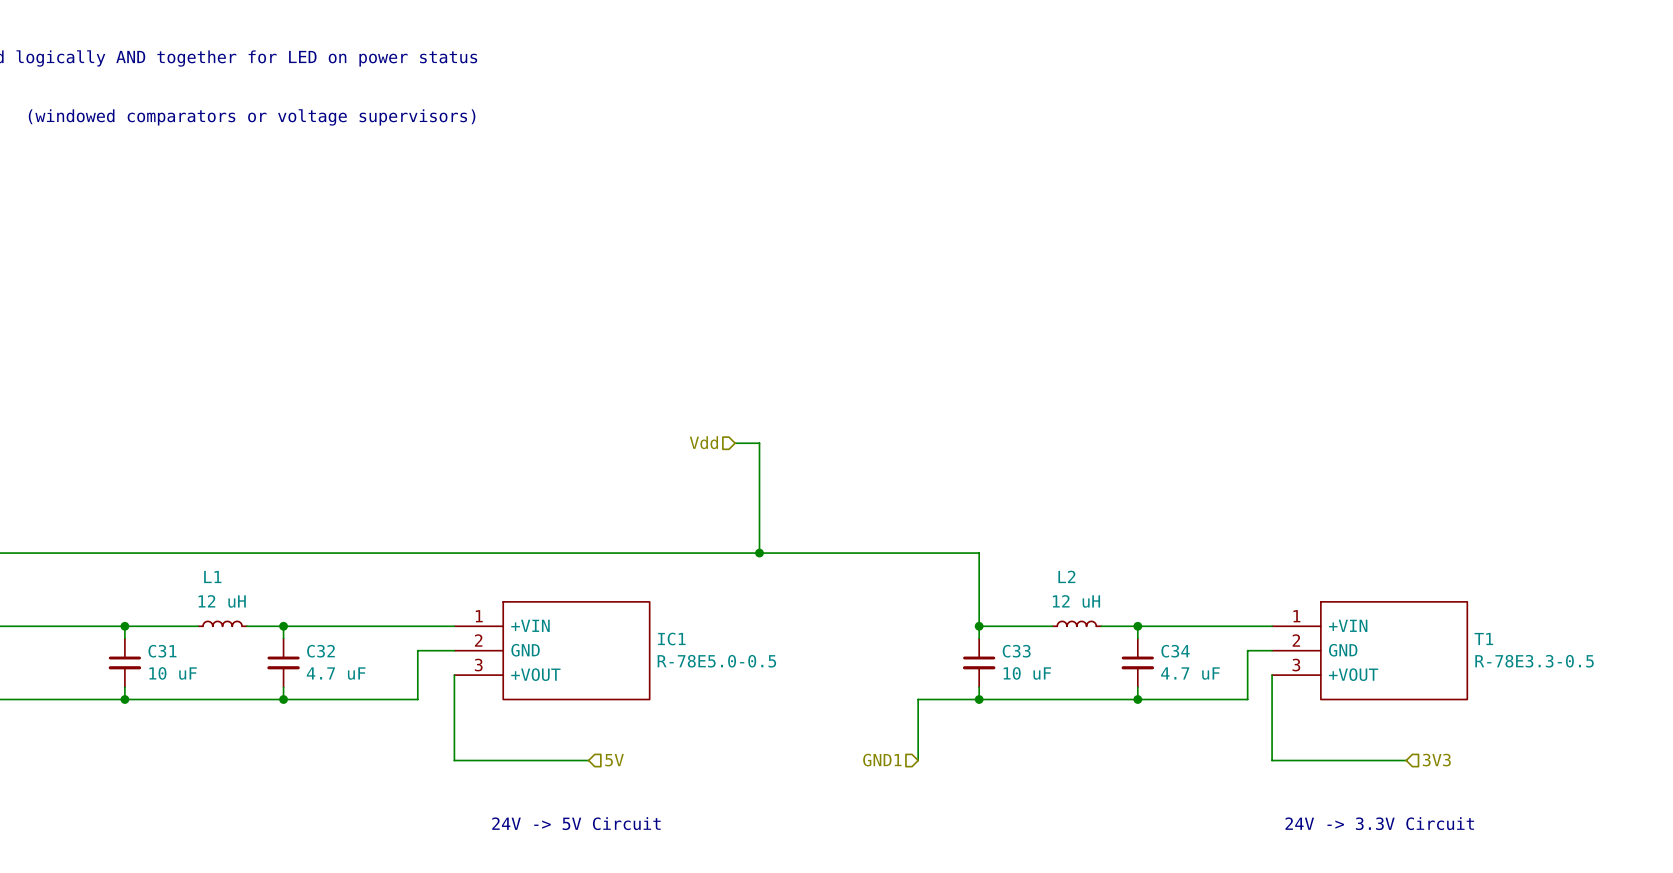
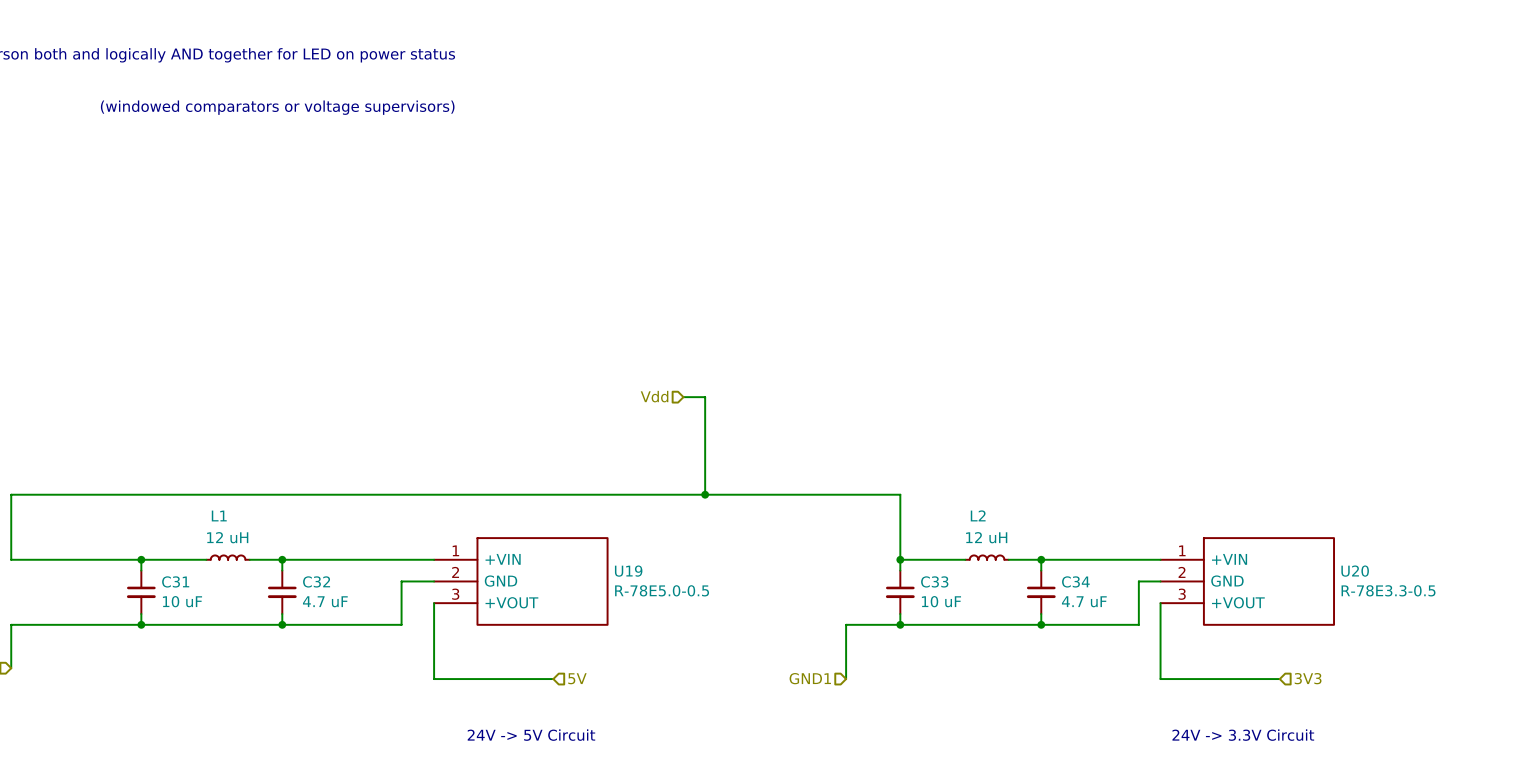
IC1 name: IC1 (671, 639) -> U19 (628, 571)
T1 name: T1 (1483, 639) -> U20 (1355, 571)

